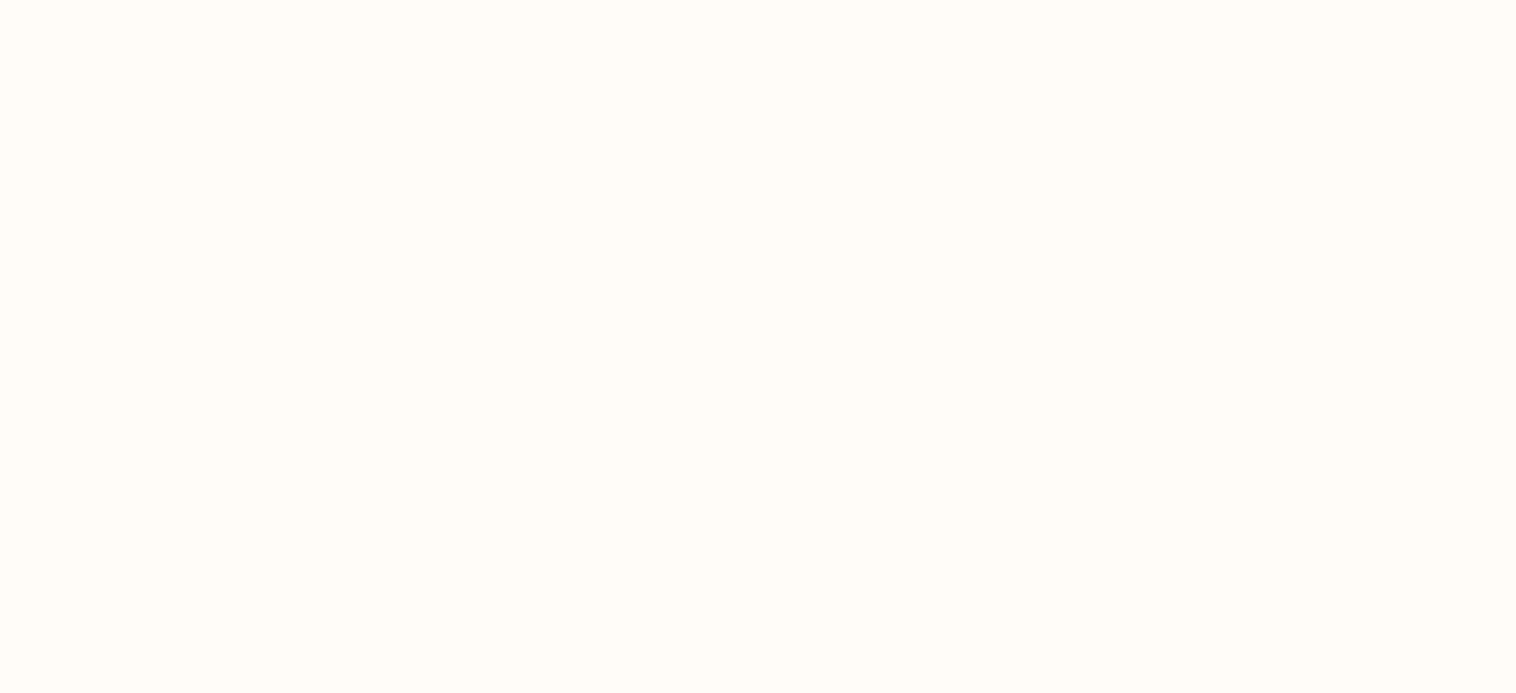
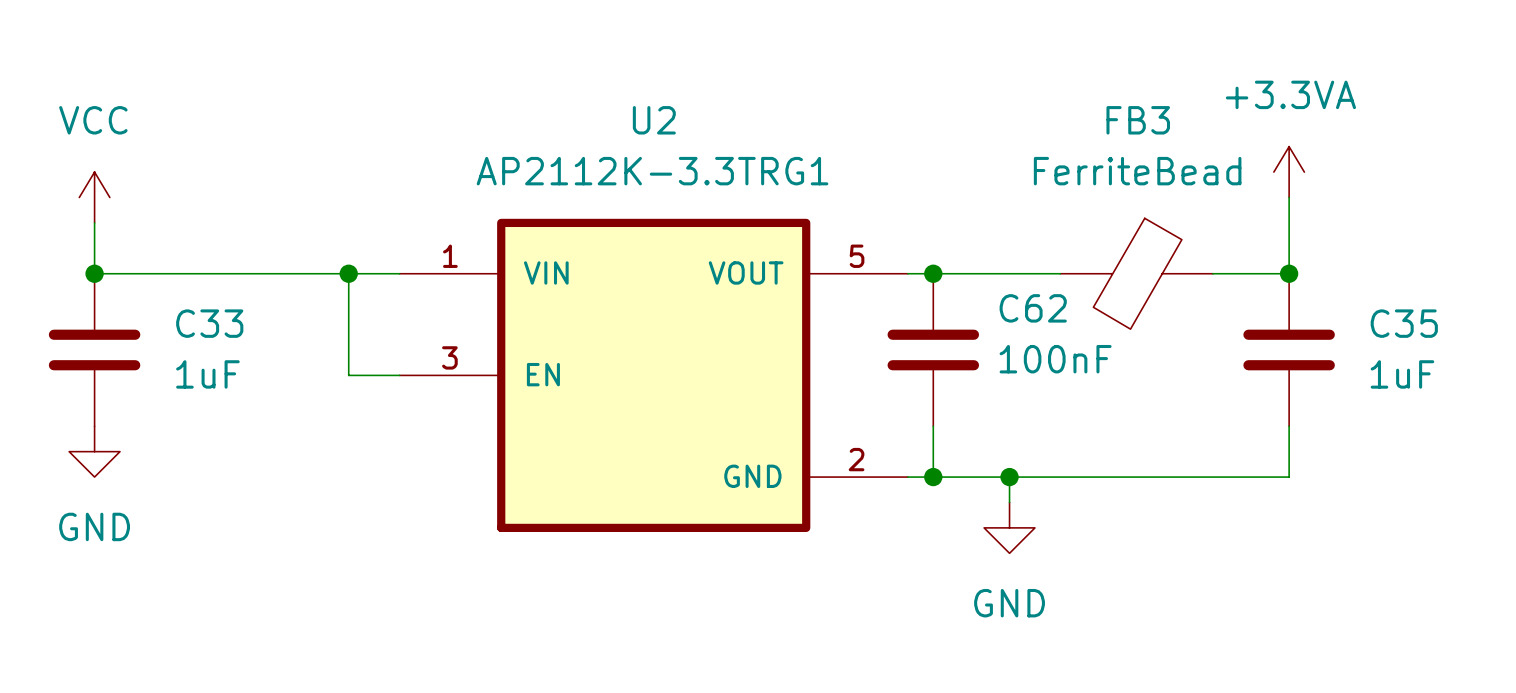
power symbol: none -> +3.3VA (1289, 172)
power symbol: none -> VCC (94, 197)
wire: none -> (1289, 197) (1289, 273) (1212, 273)
wire: none -> (94, 222) (94, 273) (399, 273)
junction: none -> (94, 273)
wire: none -> (348, 273) (348, 375) (399, 375)
junction: none -> (348, 273)
wire: none -> (907, 273) (1060, 273)
junction: none -> (933, 273)
FB3: none -> FerriteBead (1136, 273)
junction: none -> (1289, 273)
C33: none -> 1uF (94, 349)
C62: none -> 100nF (933, 349)
C35: none -> 1uF (1289, 349)
U2: none -> AP2112K-3.3TRG1 (653, 375)
wire: none -> (933, 426) (933, 477)
wire: none -> (1289, 426) (1289, 477) (907, 477)
power symbol: none -> GND (94, 451)
junction: none -> (933, 477)
wire: none -> (1009, 477) (1009, 502)
junction: none -> (1009, 477)
power symbol: none -> GND (1009, 527)

